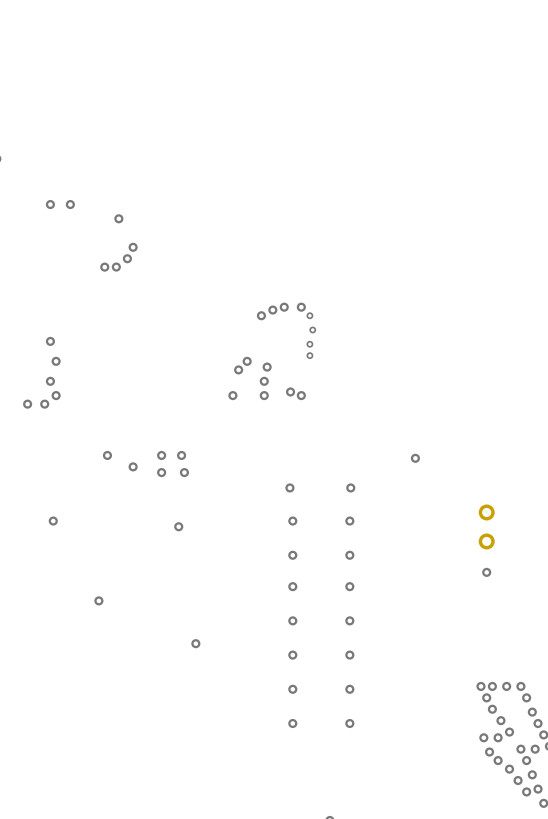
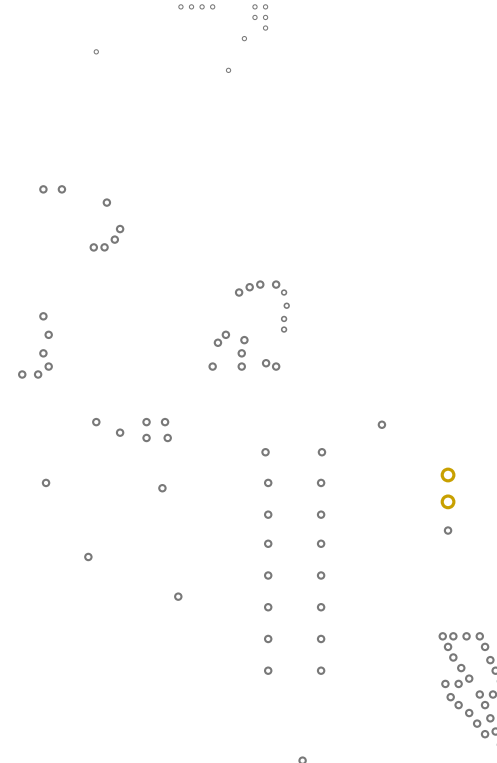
via: none -> (180, 6)
via: none -> (191, 6)
via: none -> (202, 6)
via: none -> (212, 6)
via: none -> (254, 6)
via: none -> (265, 6)
via: none -> (254, 17)
via: none -> (265, 17)
via: none -> (265, 28)
via: none -> (244, 38)
via: none -> (96, 51)
via: none -> (228, 70)

